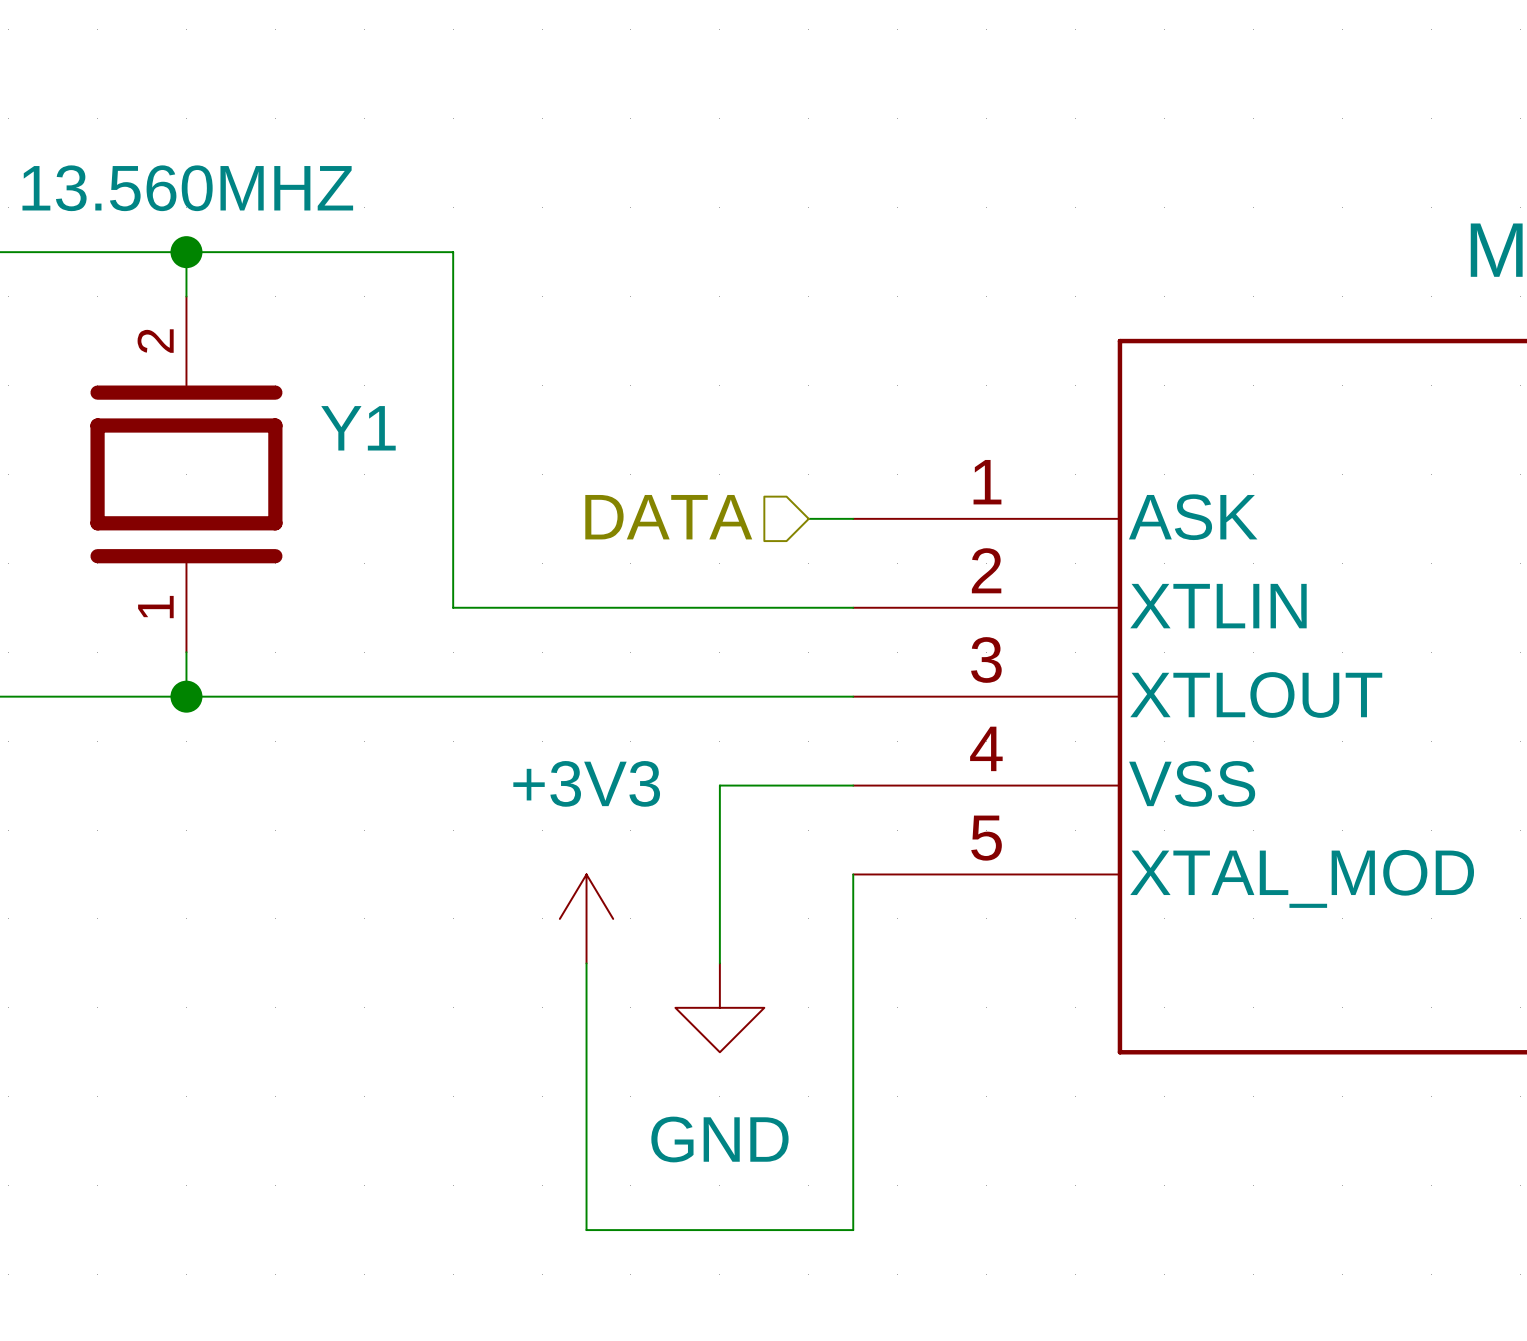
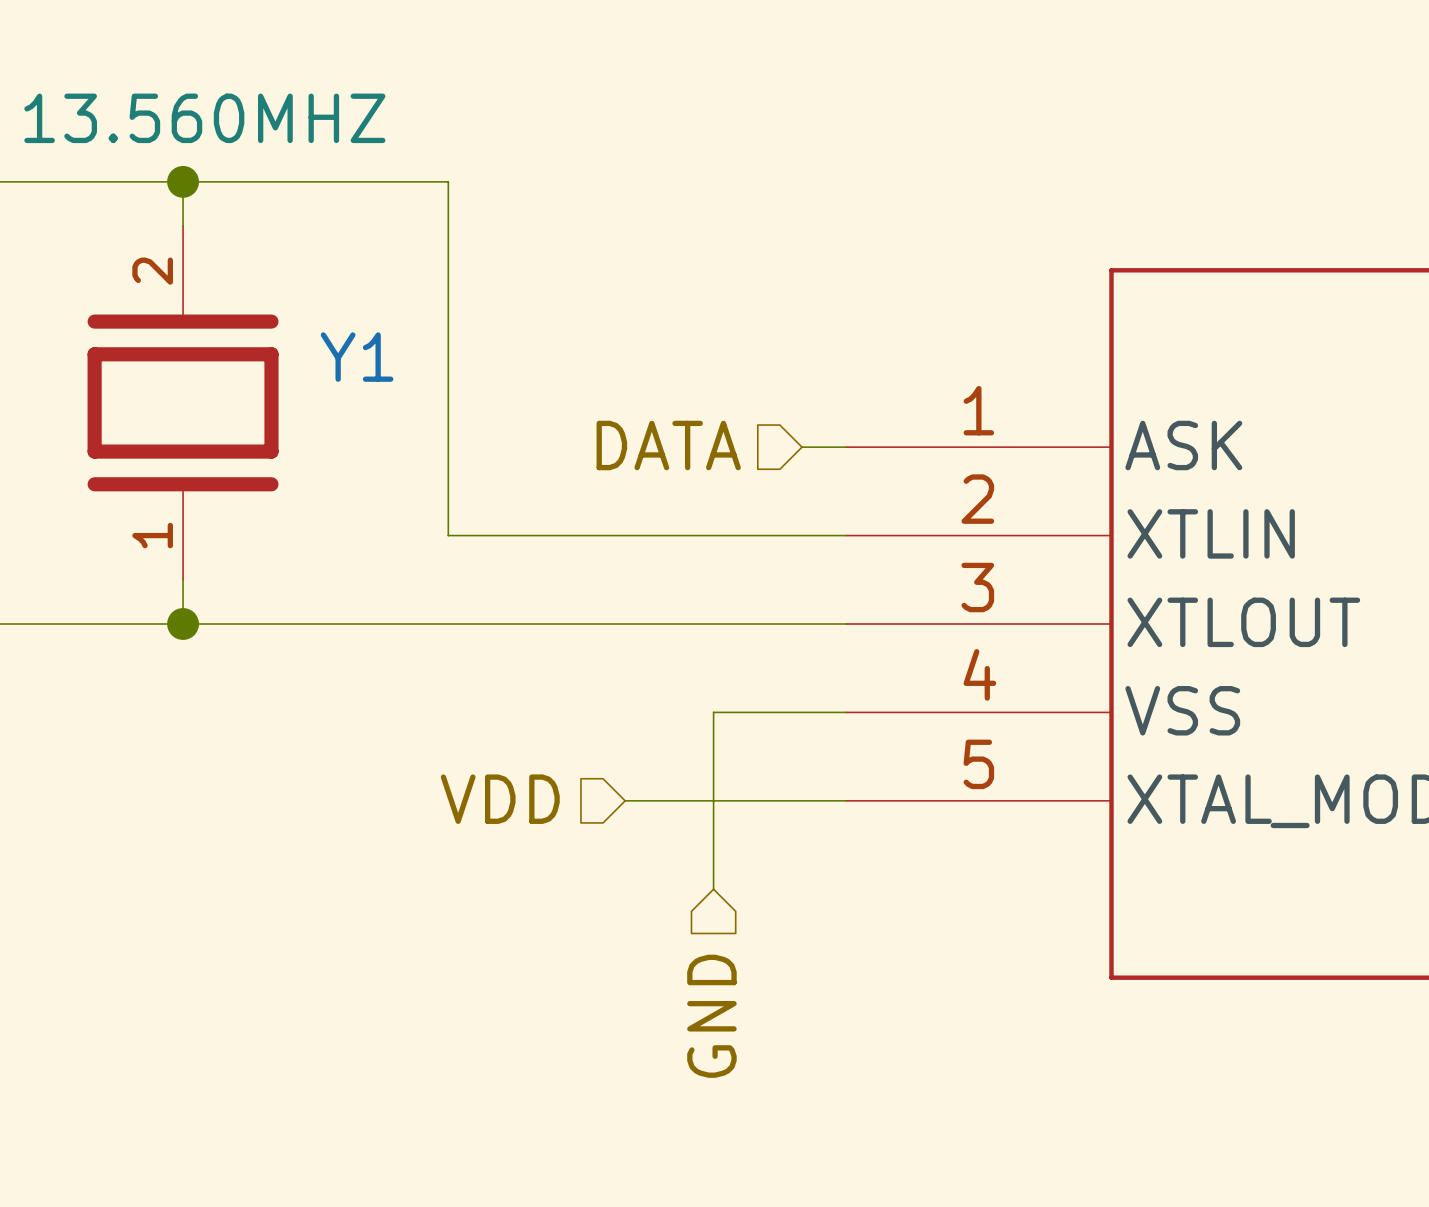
hierarchical label: none -> VDD (500, 799)
wire: (853, 874) (853, 1230) (586, 1230) (586, 963) -> (846, 800) (625, 800)
power symbol: +3V3 (586, 918) -> none
power symbol: GND (719, 1007) -> none
hierarchical label: none -> GND (711, 1016)

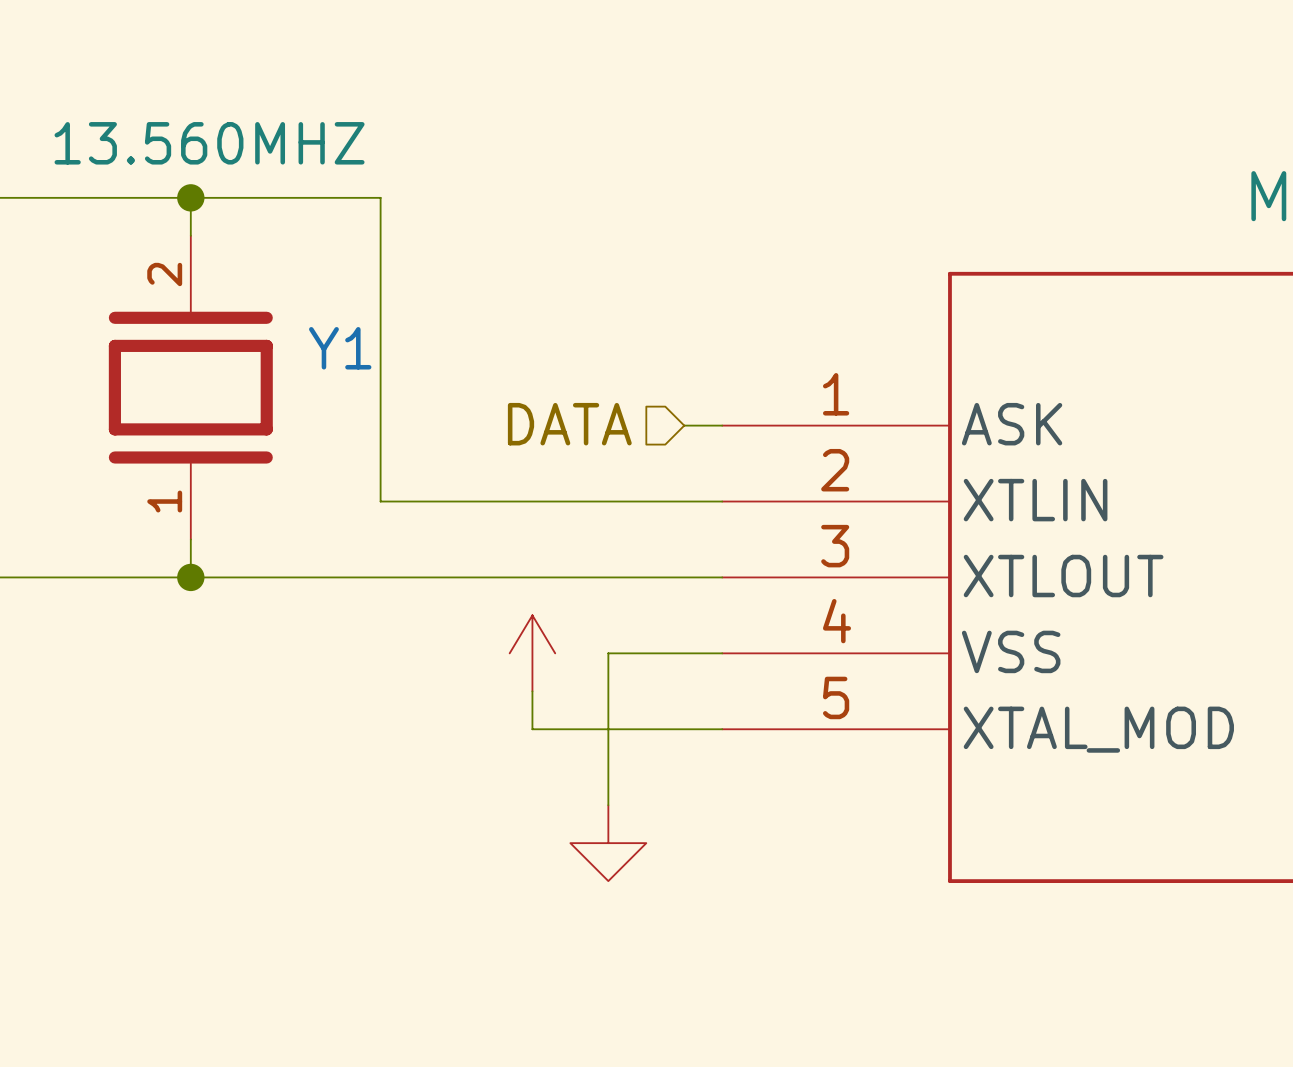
wire: (183, 181) (183, 226) -> (190, 197) (190, 235)
junction position: (183, 181) -> (190, 197)
Y1 position: (183, 402) -> (190, 387)
wire: (183, 579) (183, 623) -> (190, 539) (190, 577)
junction position: (183, 623) -> (190, 577)
power symbol: none -> (532, 653)
wire: none -> (532, 691) (532, 729)
hierarchical label: VDD (500, 799) -> none
power symbol: none -> (608, 843)
hierarchical label: GND (711, 1016) -> none

